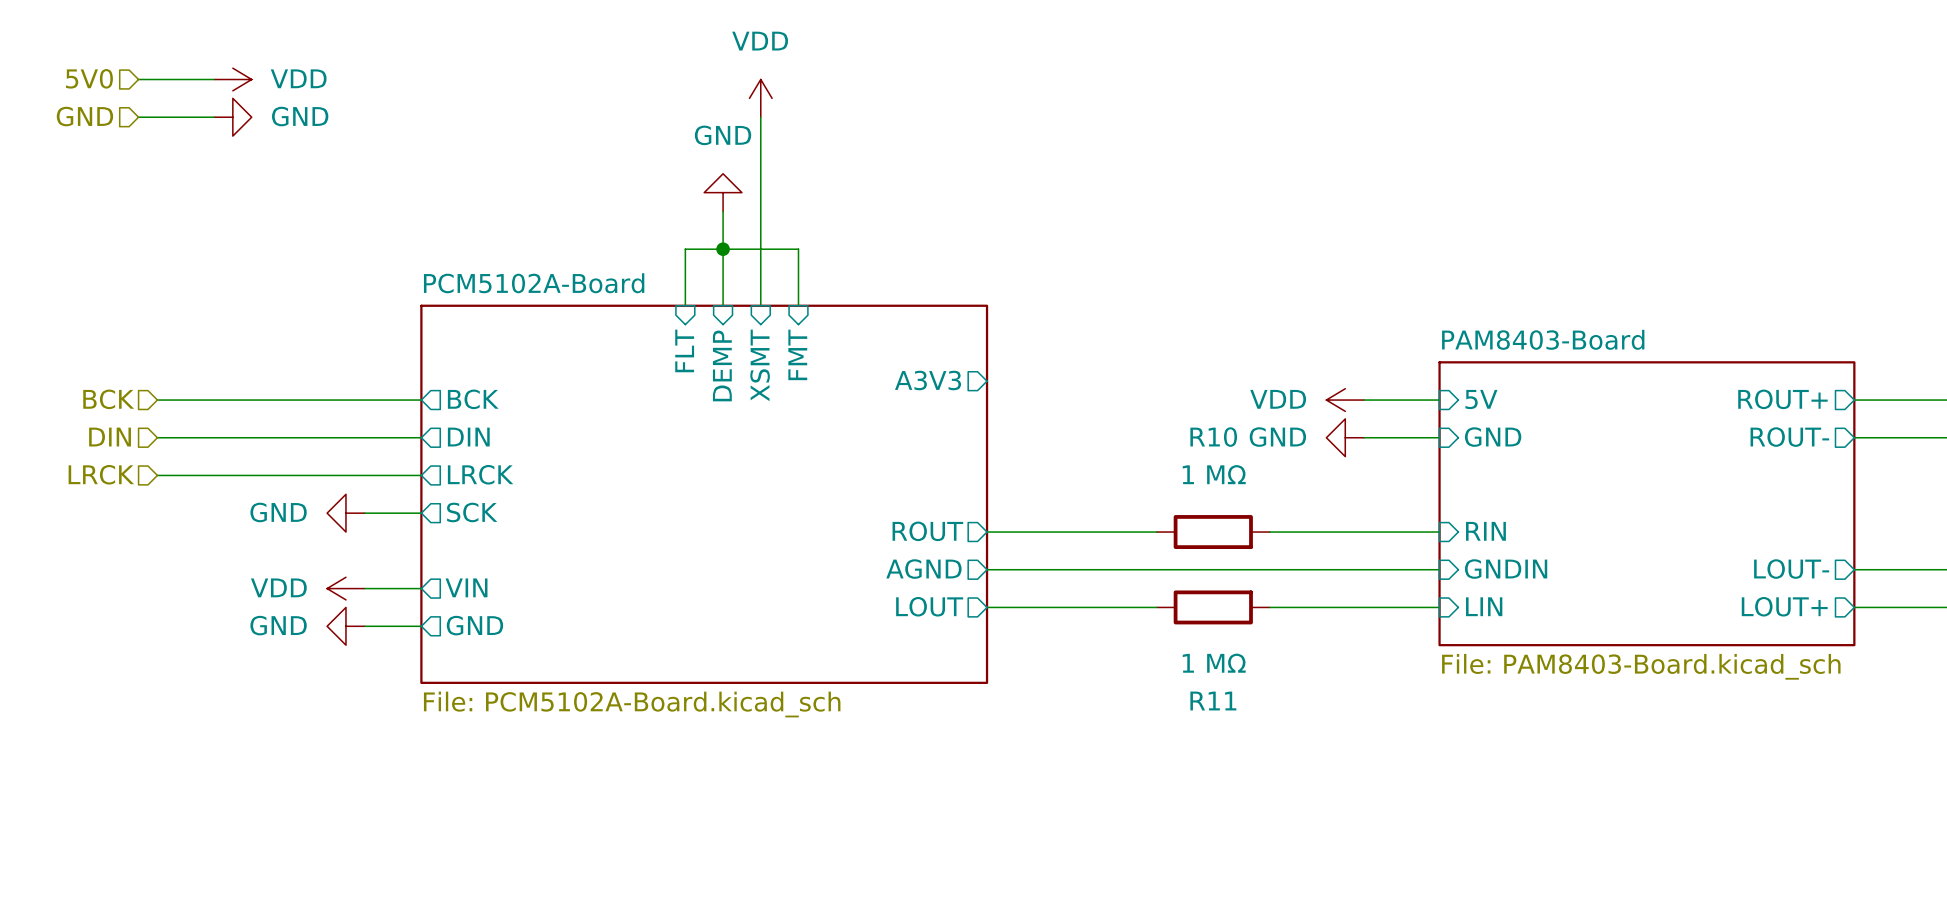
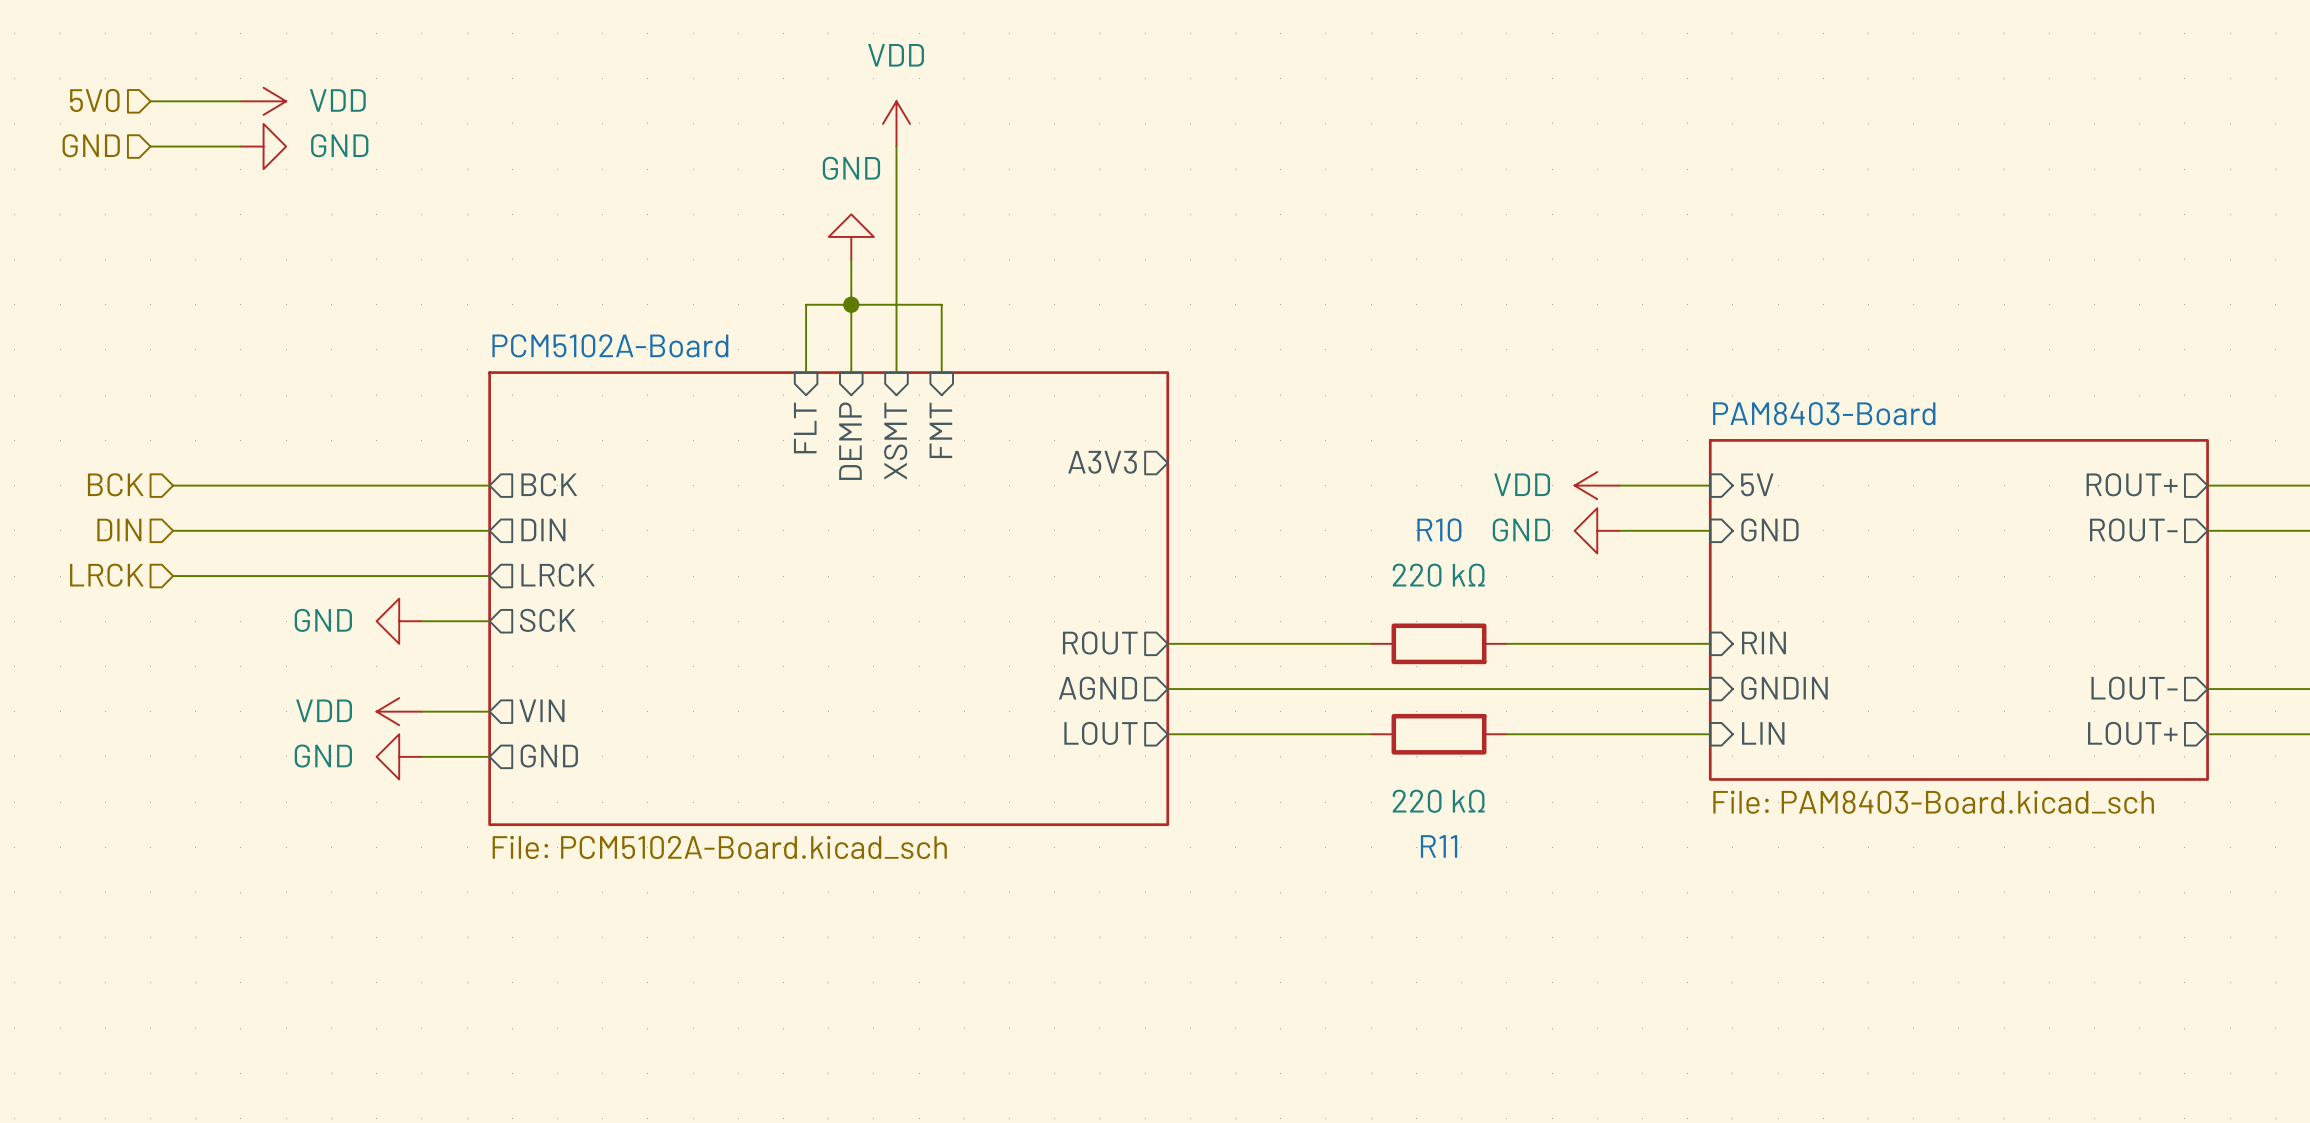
R10 value: 1 MΩ (1214, 474) -> 220 kΩ (1438, 575)
R11 value: 1 MΩ (1214, 663) -> 220 kΩ (1438, 801)

